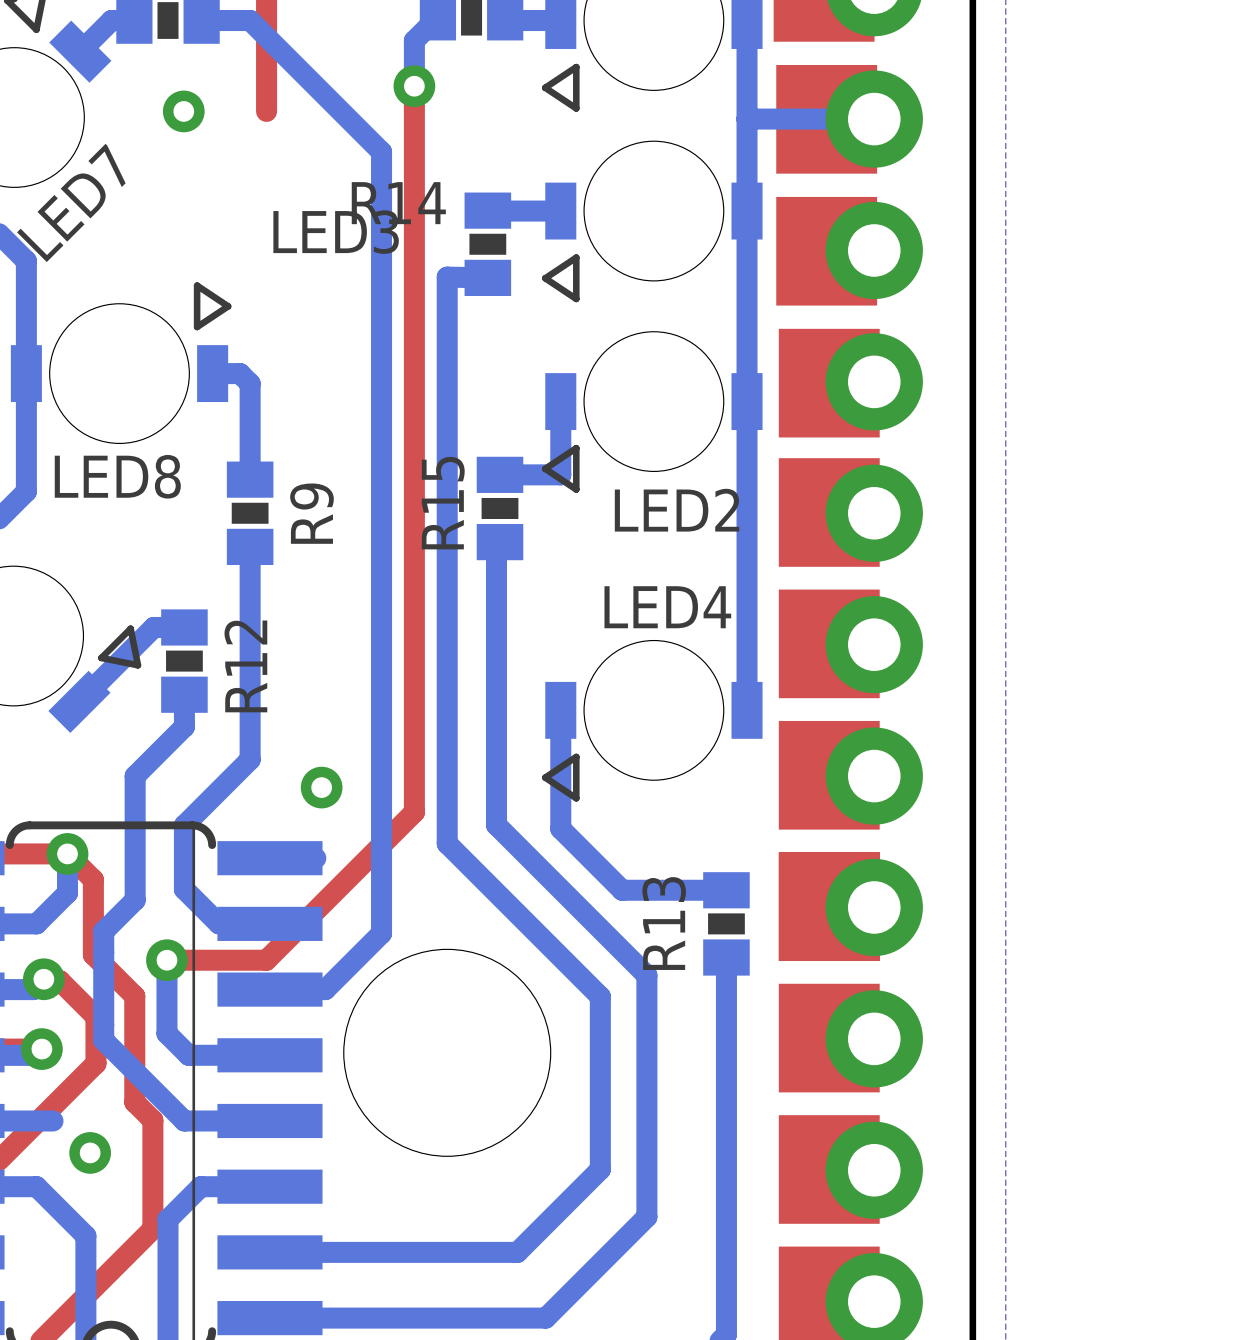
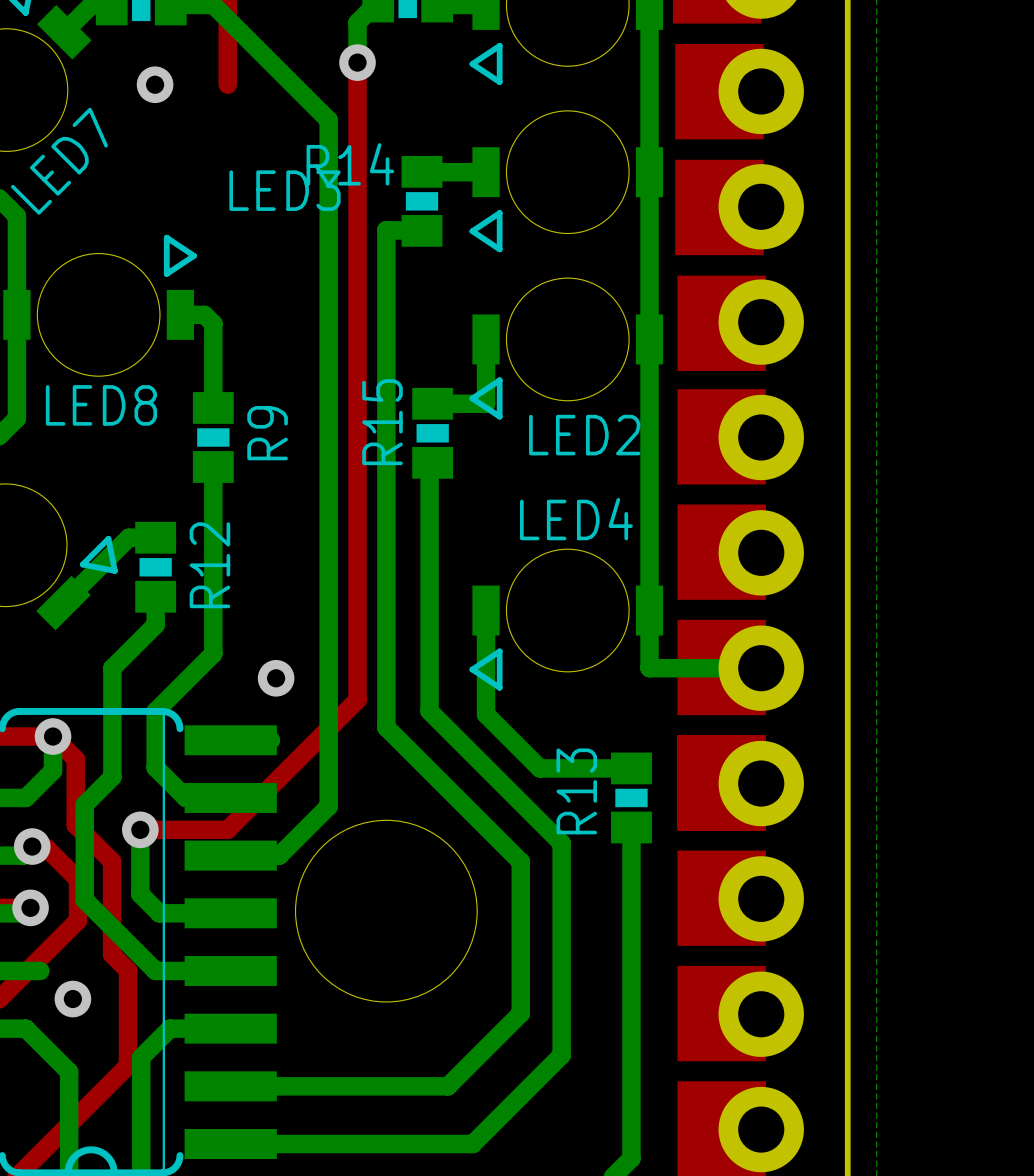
bottom track: (874, 119) (747, 119) -> none
bottom track: none -> (649, 610) (649, 668) (761, 668)

